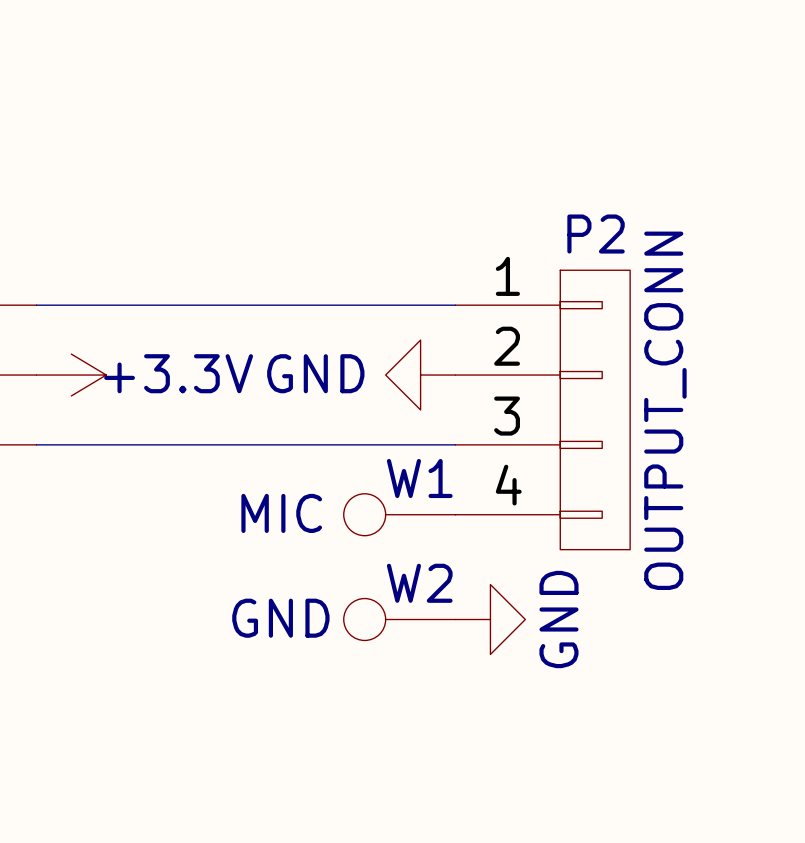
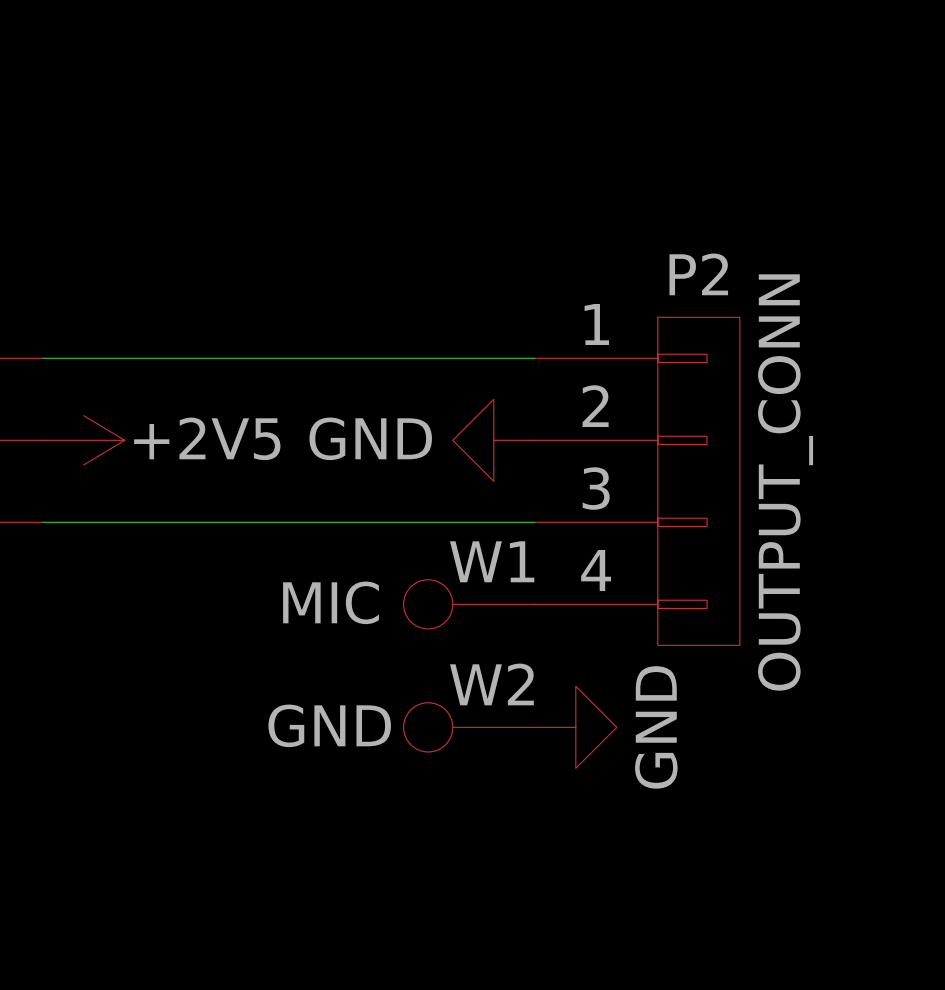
power symbol: +3.3V (71, 375) -> +2V5 (83, 440)

